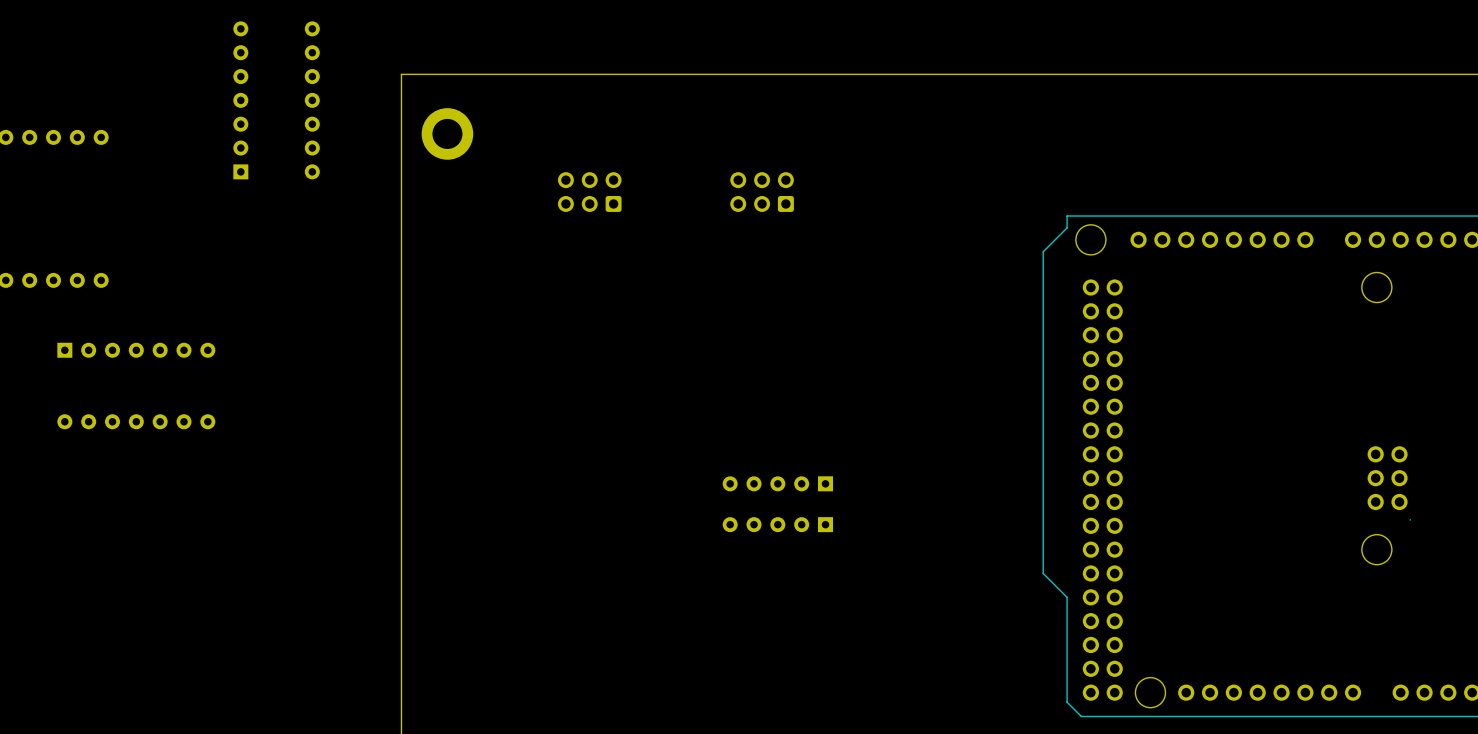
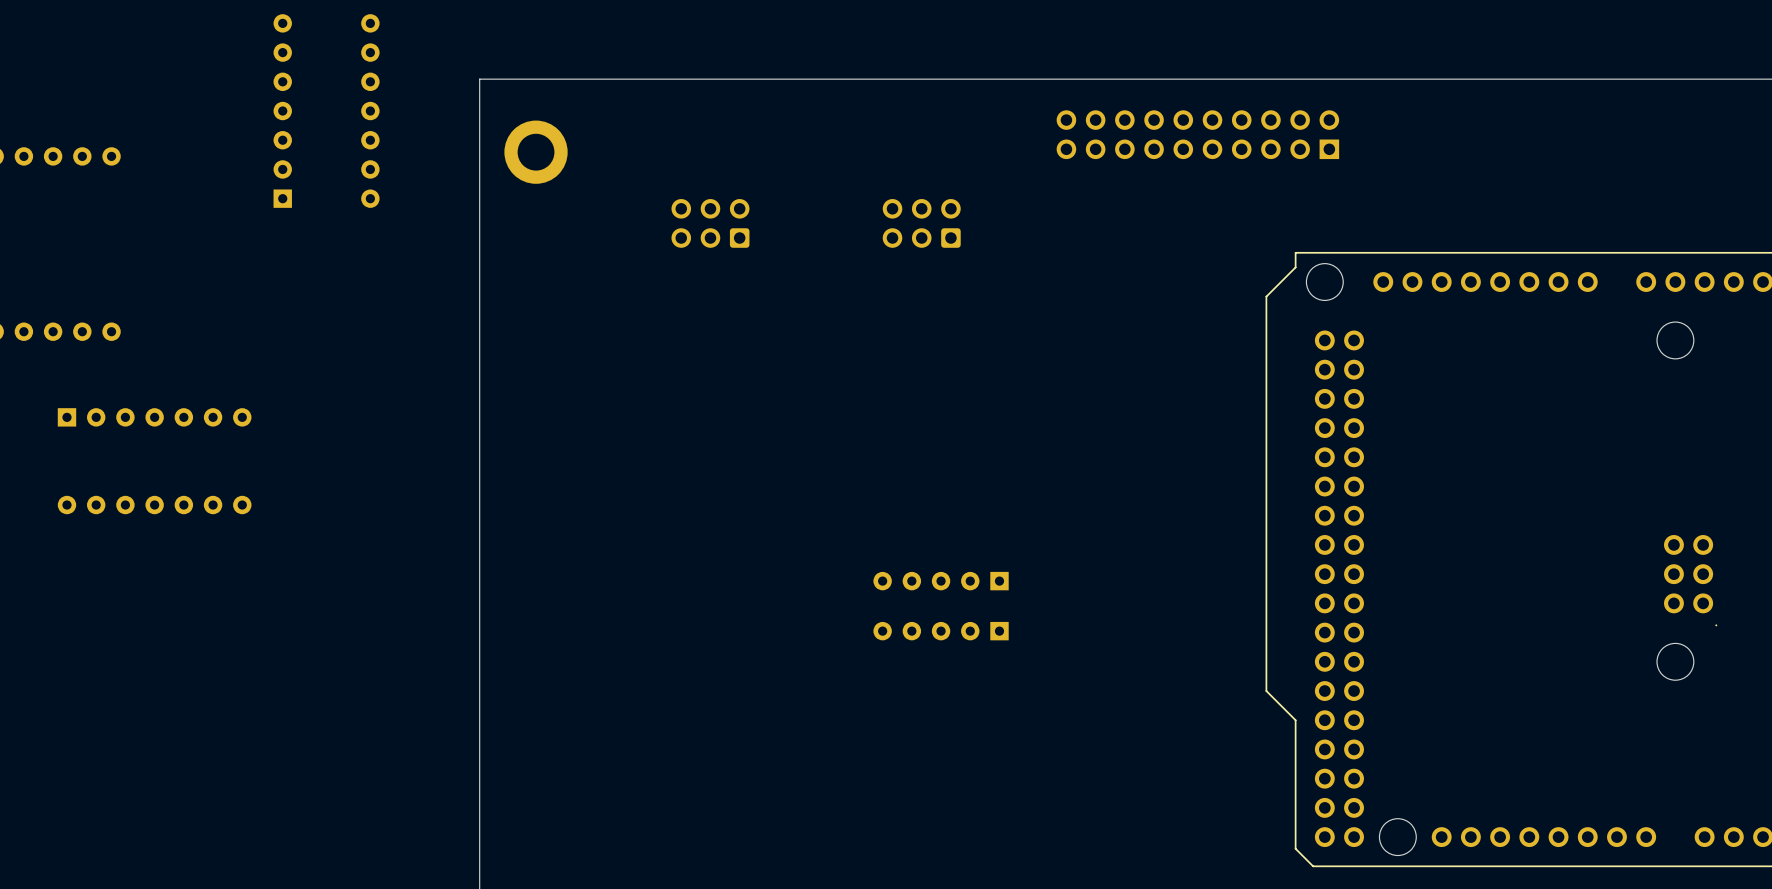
part: none -> (1197, 134)

